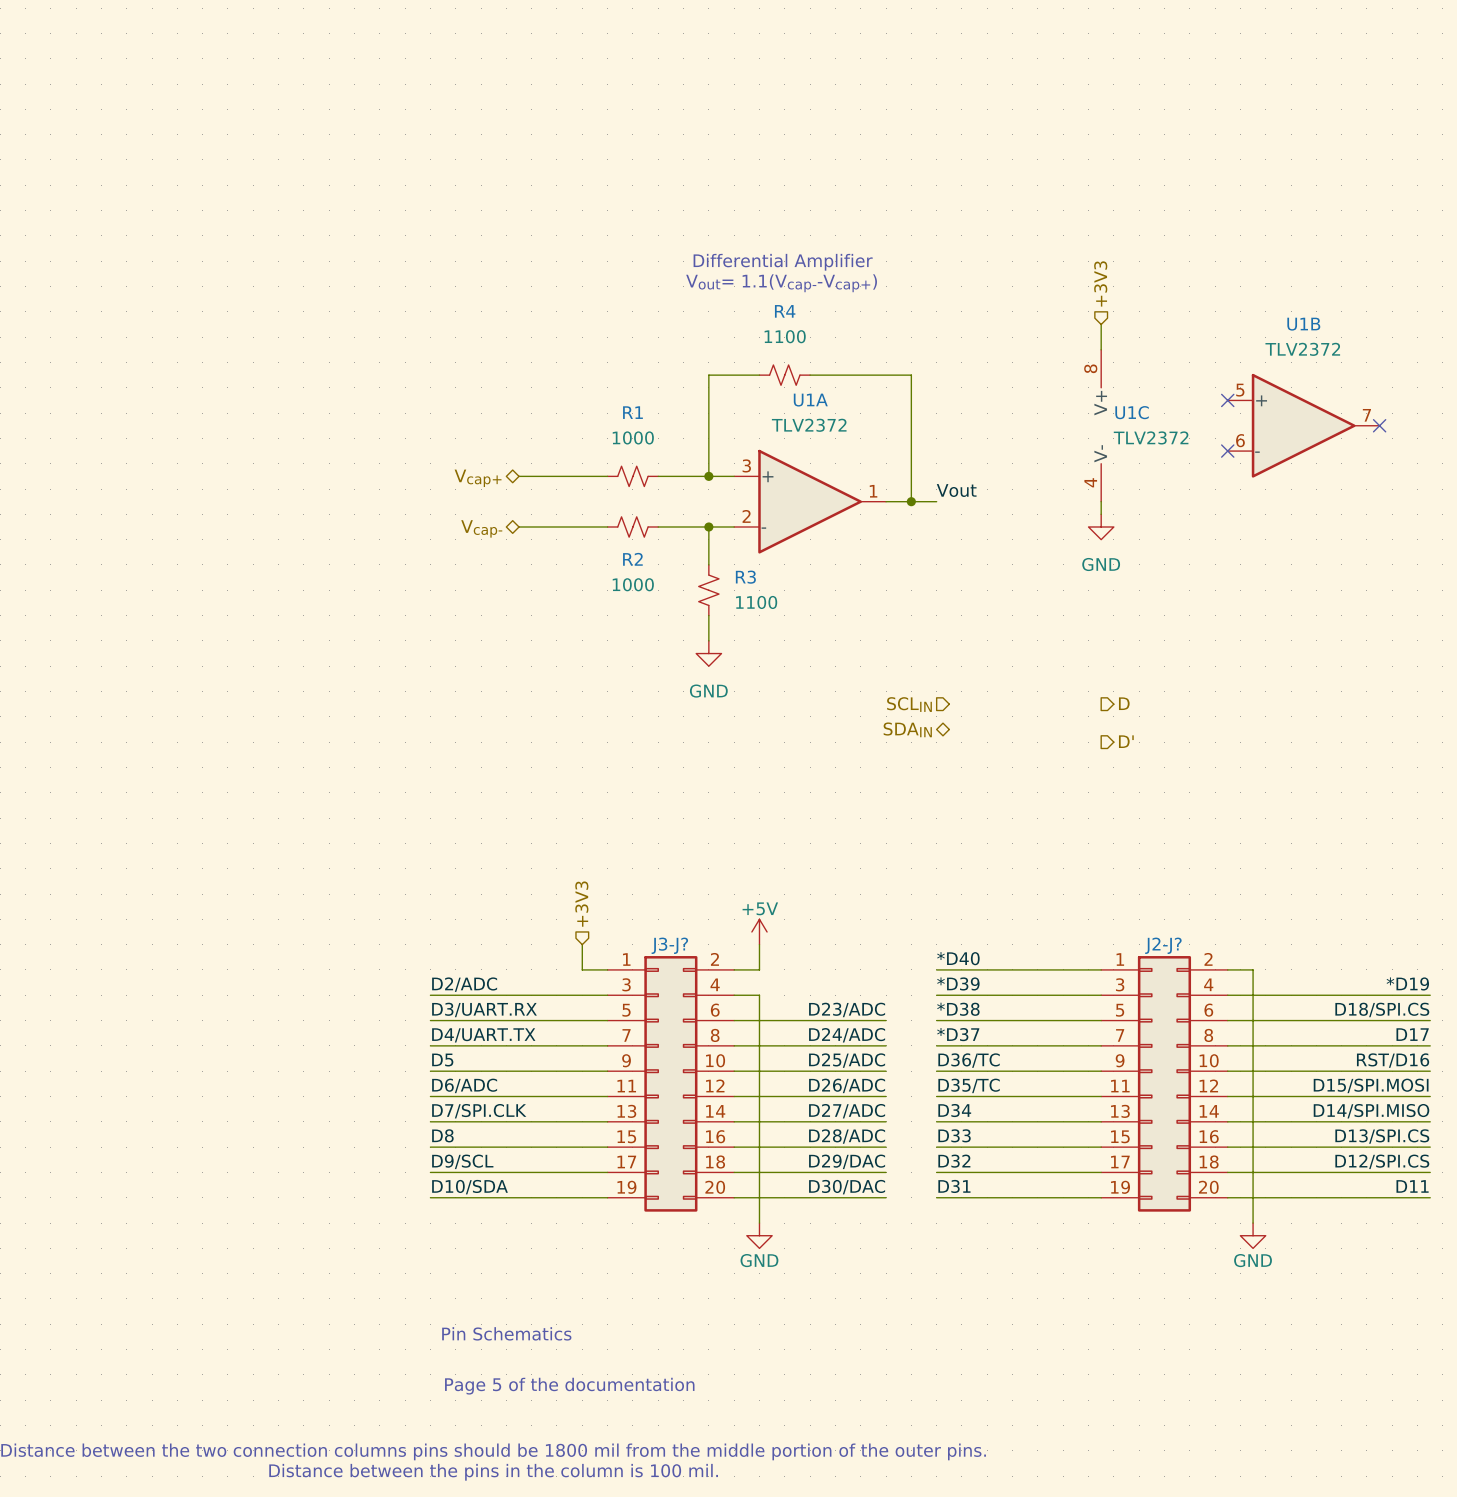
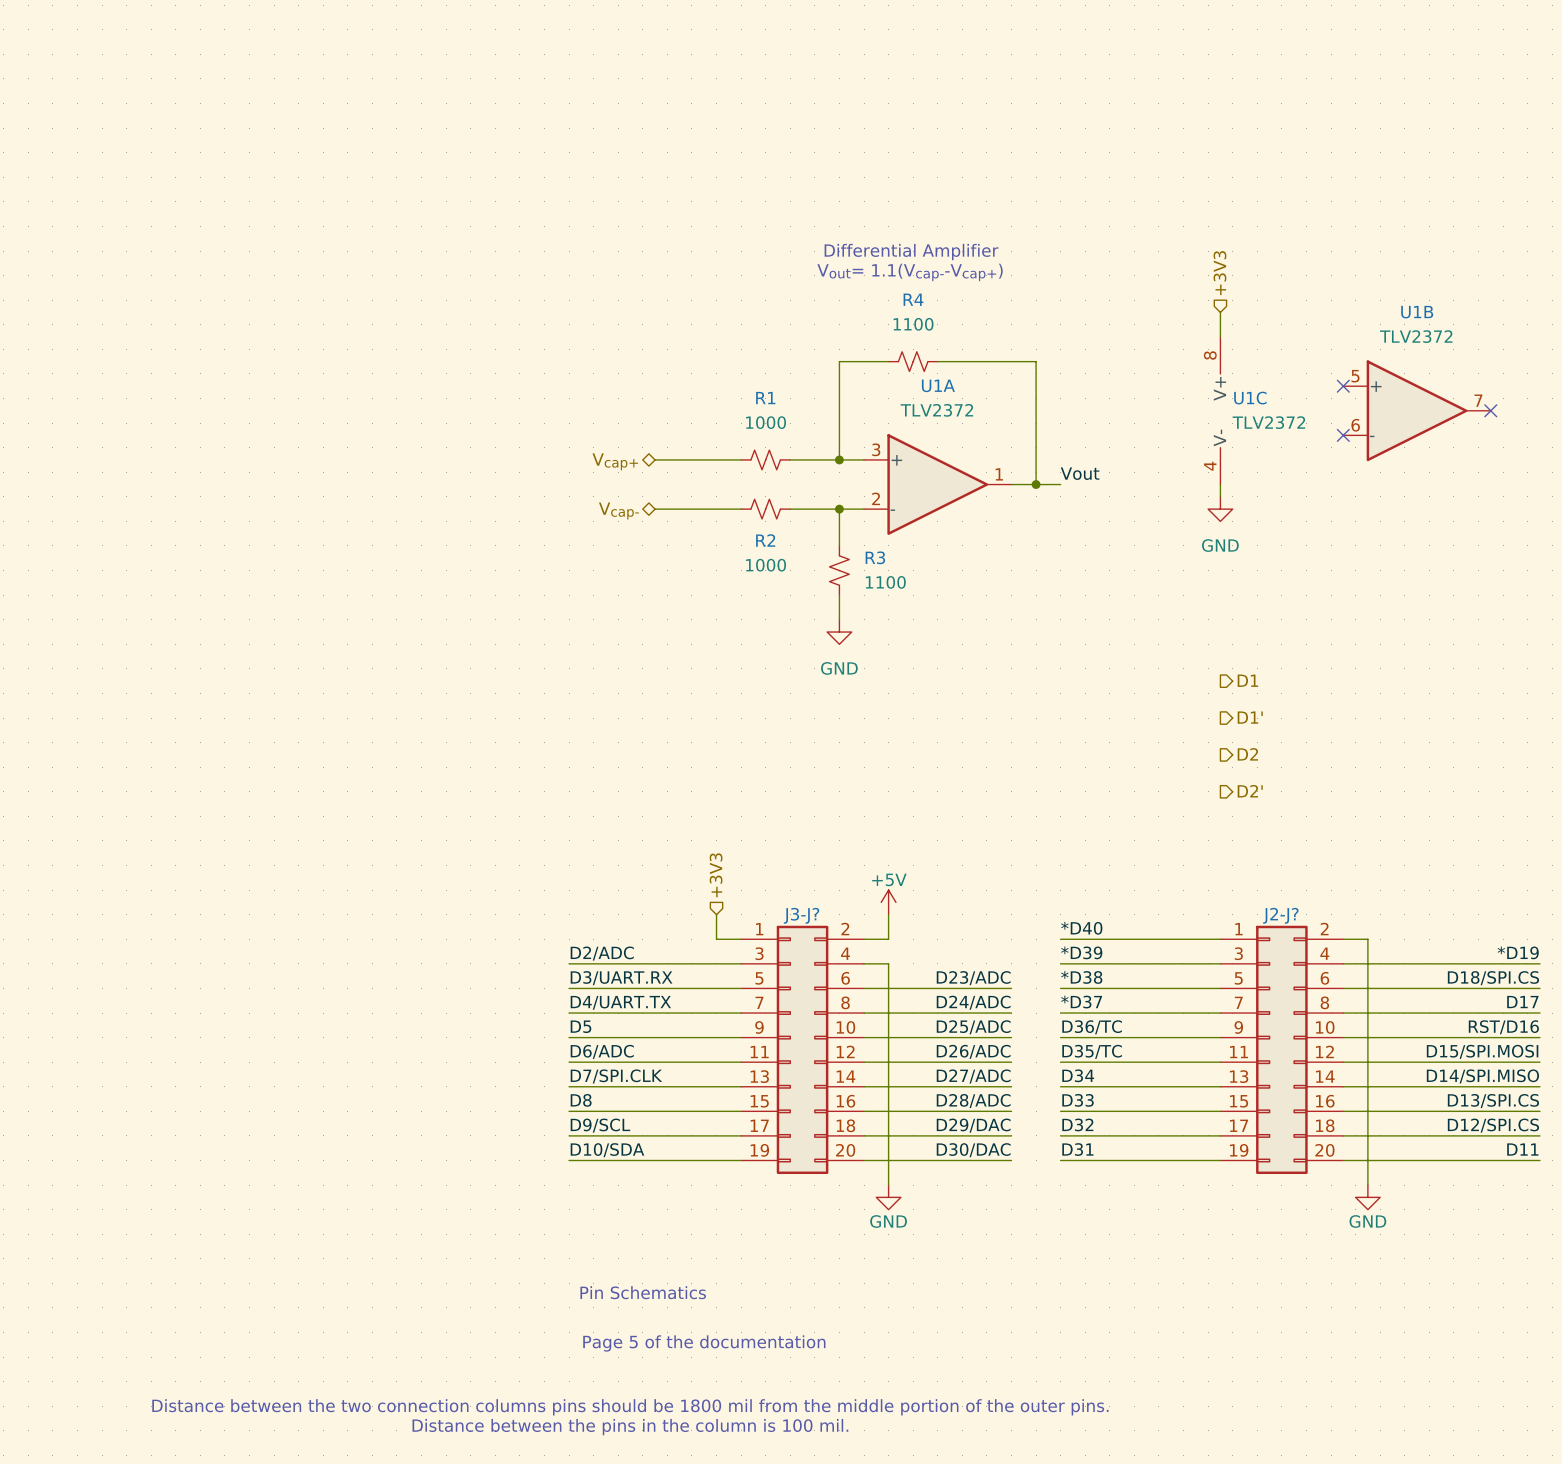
hierarchical label: D (1124, 703) -> D1 (1247, 680)
hierarchical label: SCLIN (909, 704) -> none
hierarchical label: SDAIN (907, 729) -> none
hierarchical label: D' (1126, 741) -> D1' (1250, 717)
hierarchical label: none -> D2 (1247, 754)
hierarchical label: none -> D2' (1250, 791)

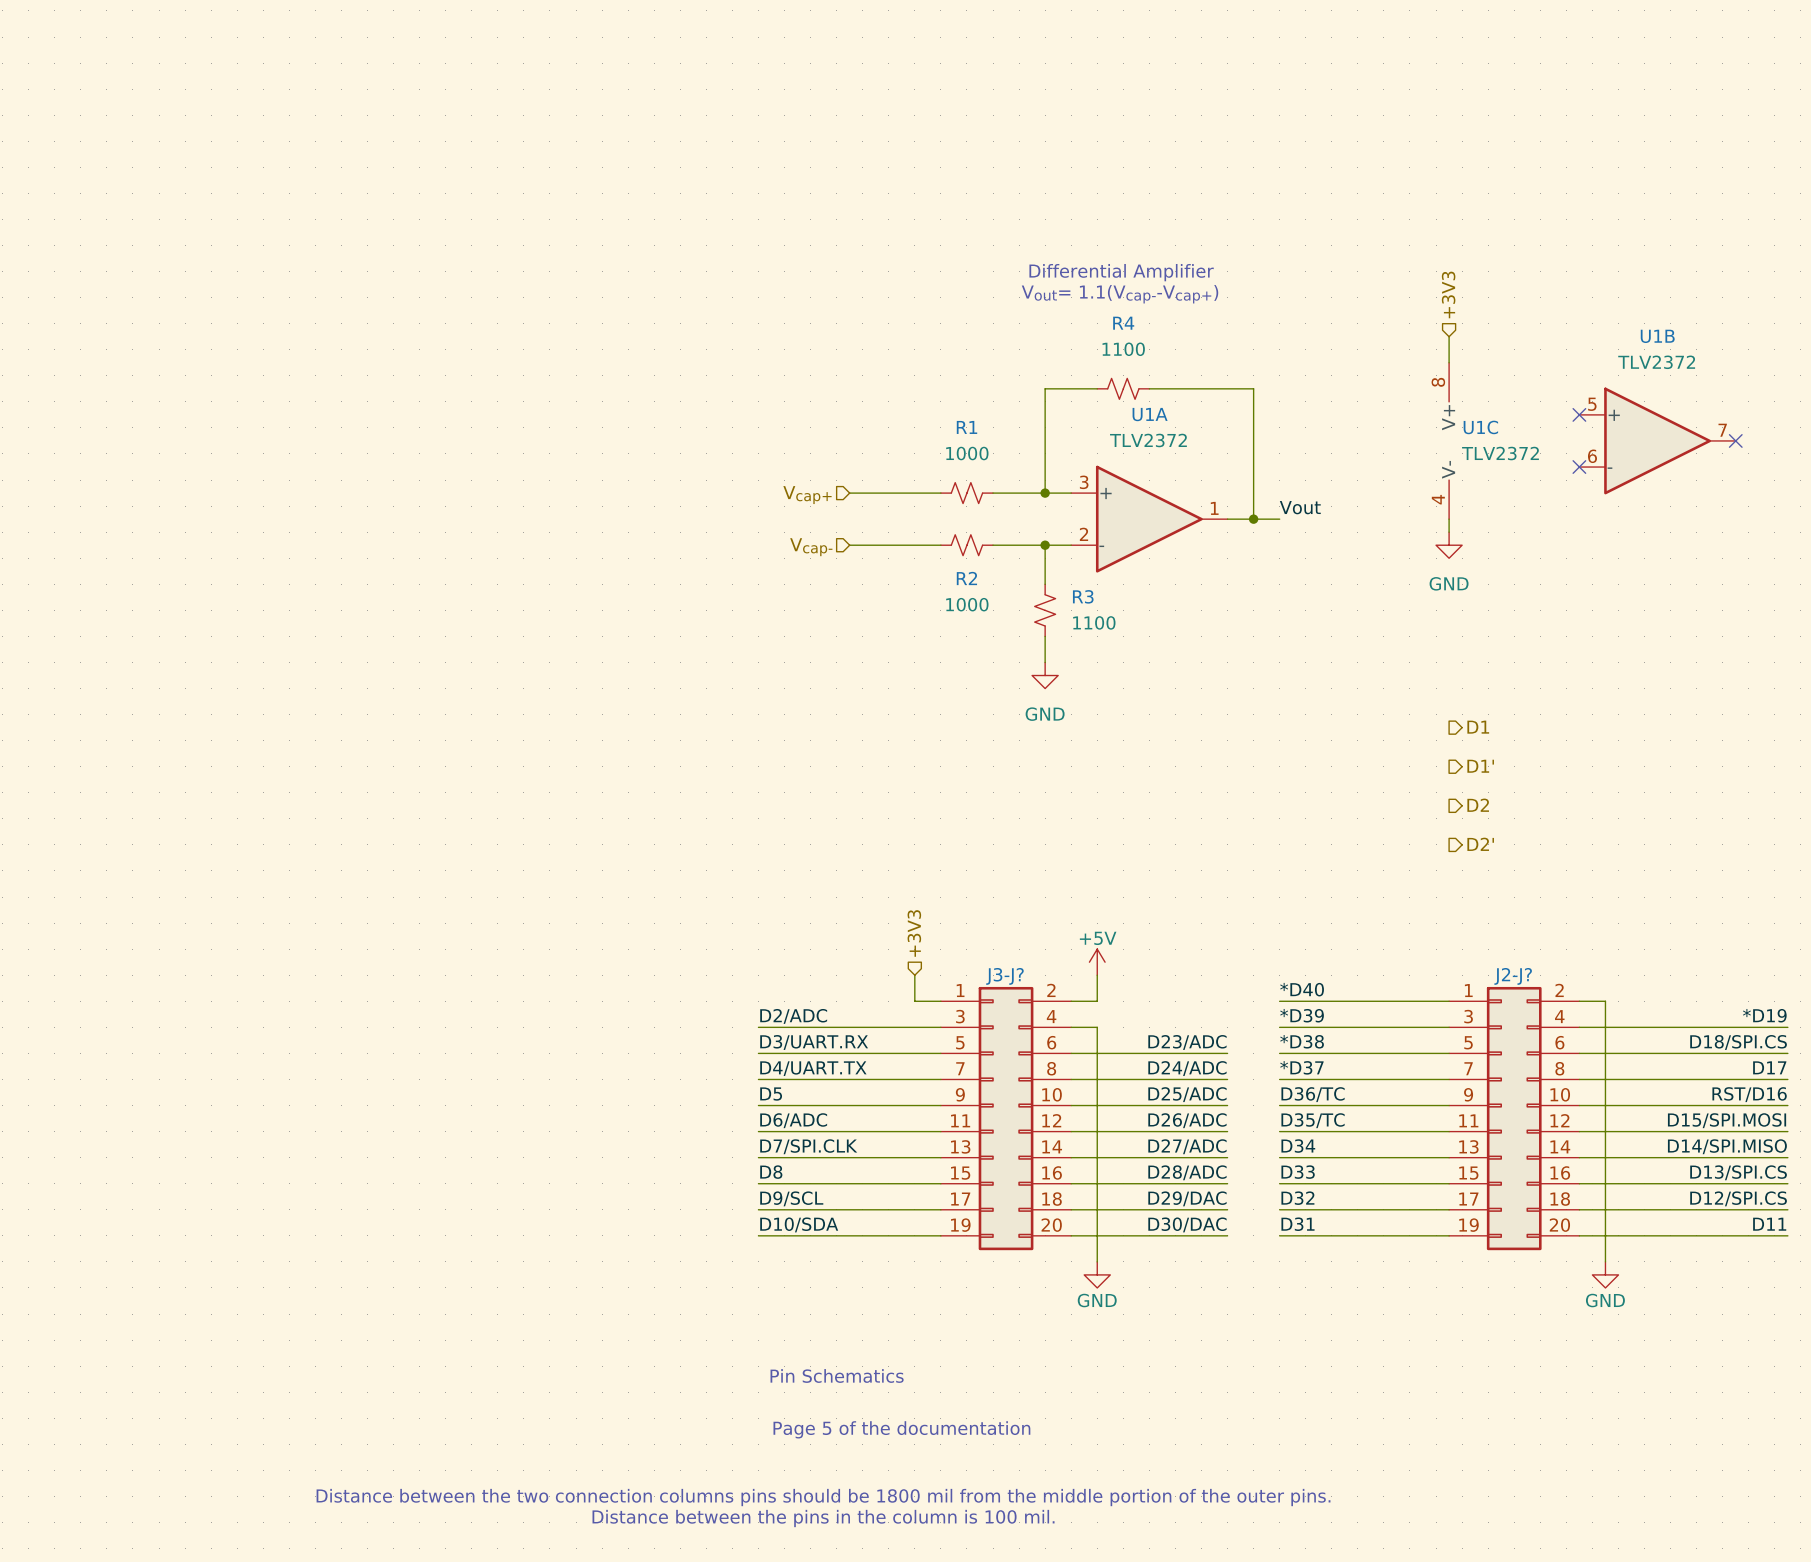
hierarchical label shape: bidirectional (615, 461) -> input (807, 495)
hierarchical label shape: bidirectional (618, 510) -> input (811, 547)

